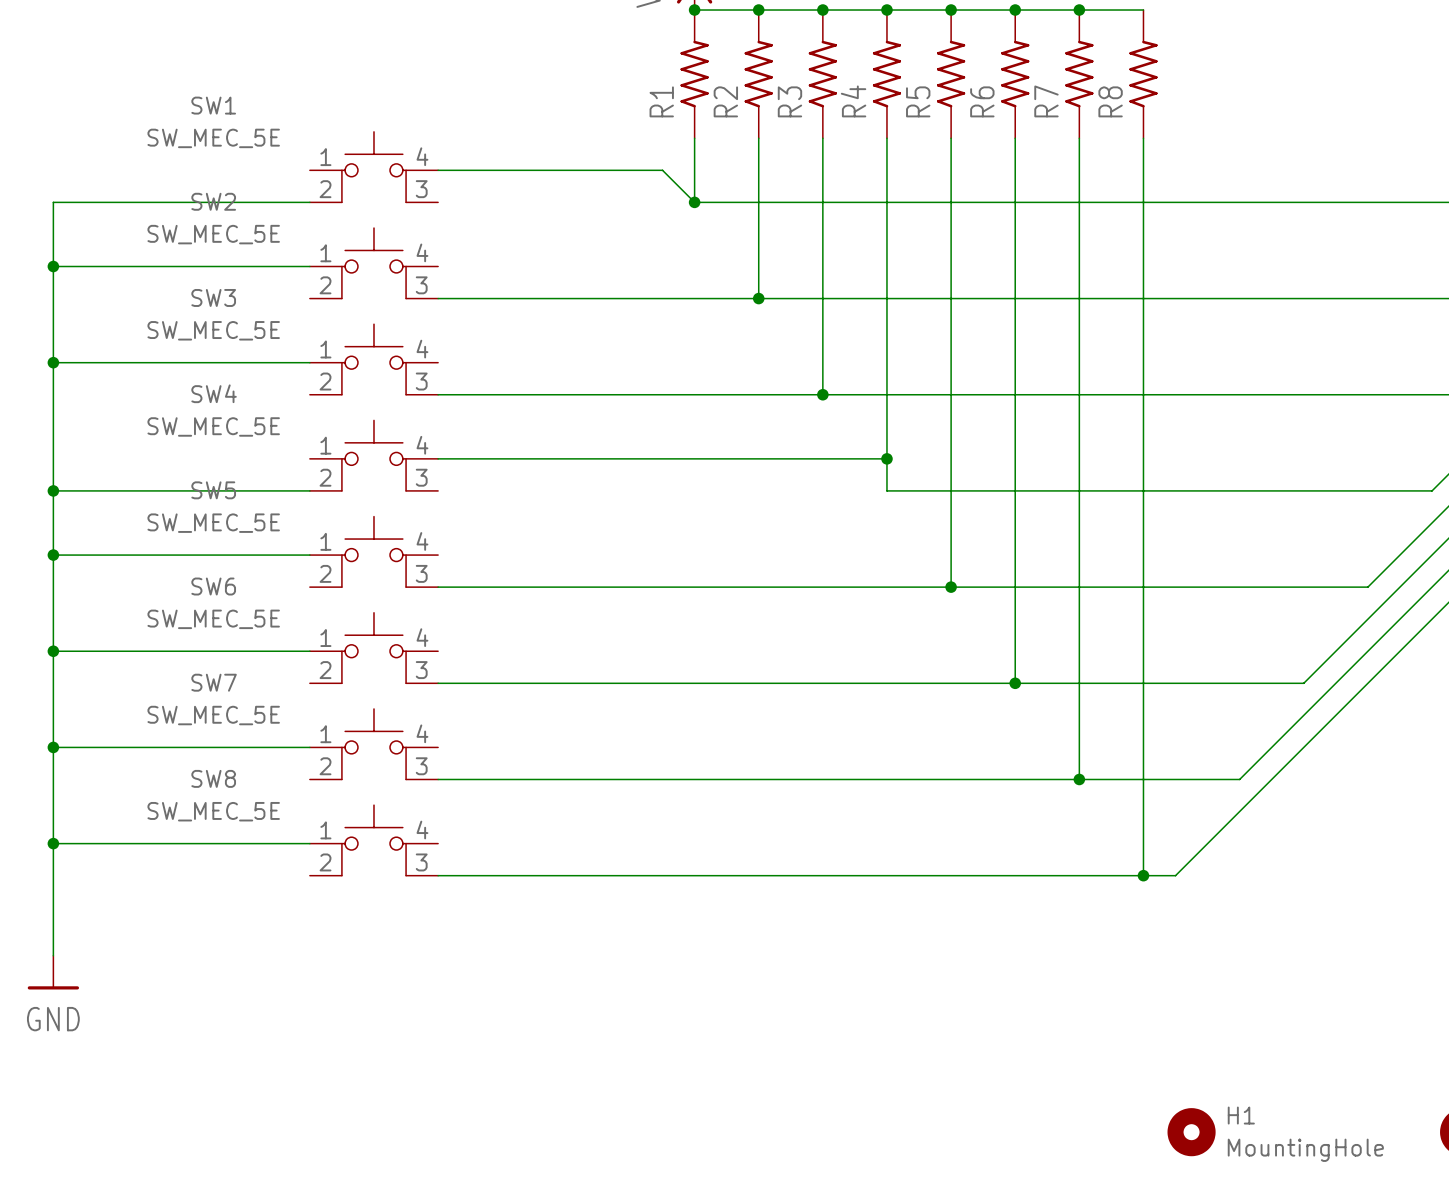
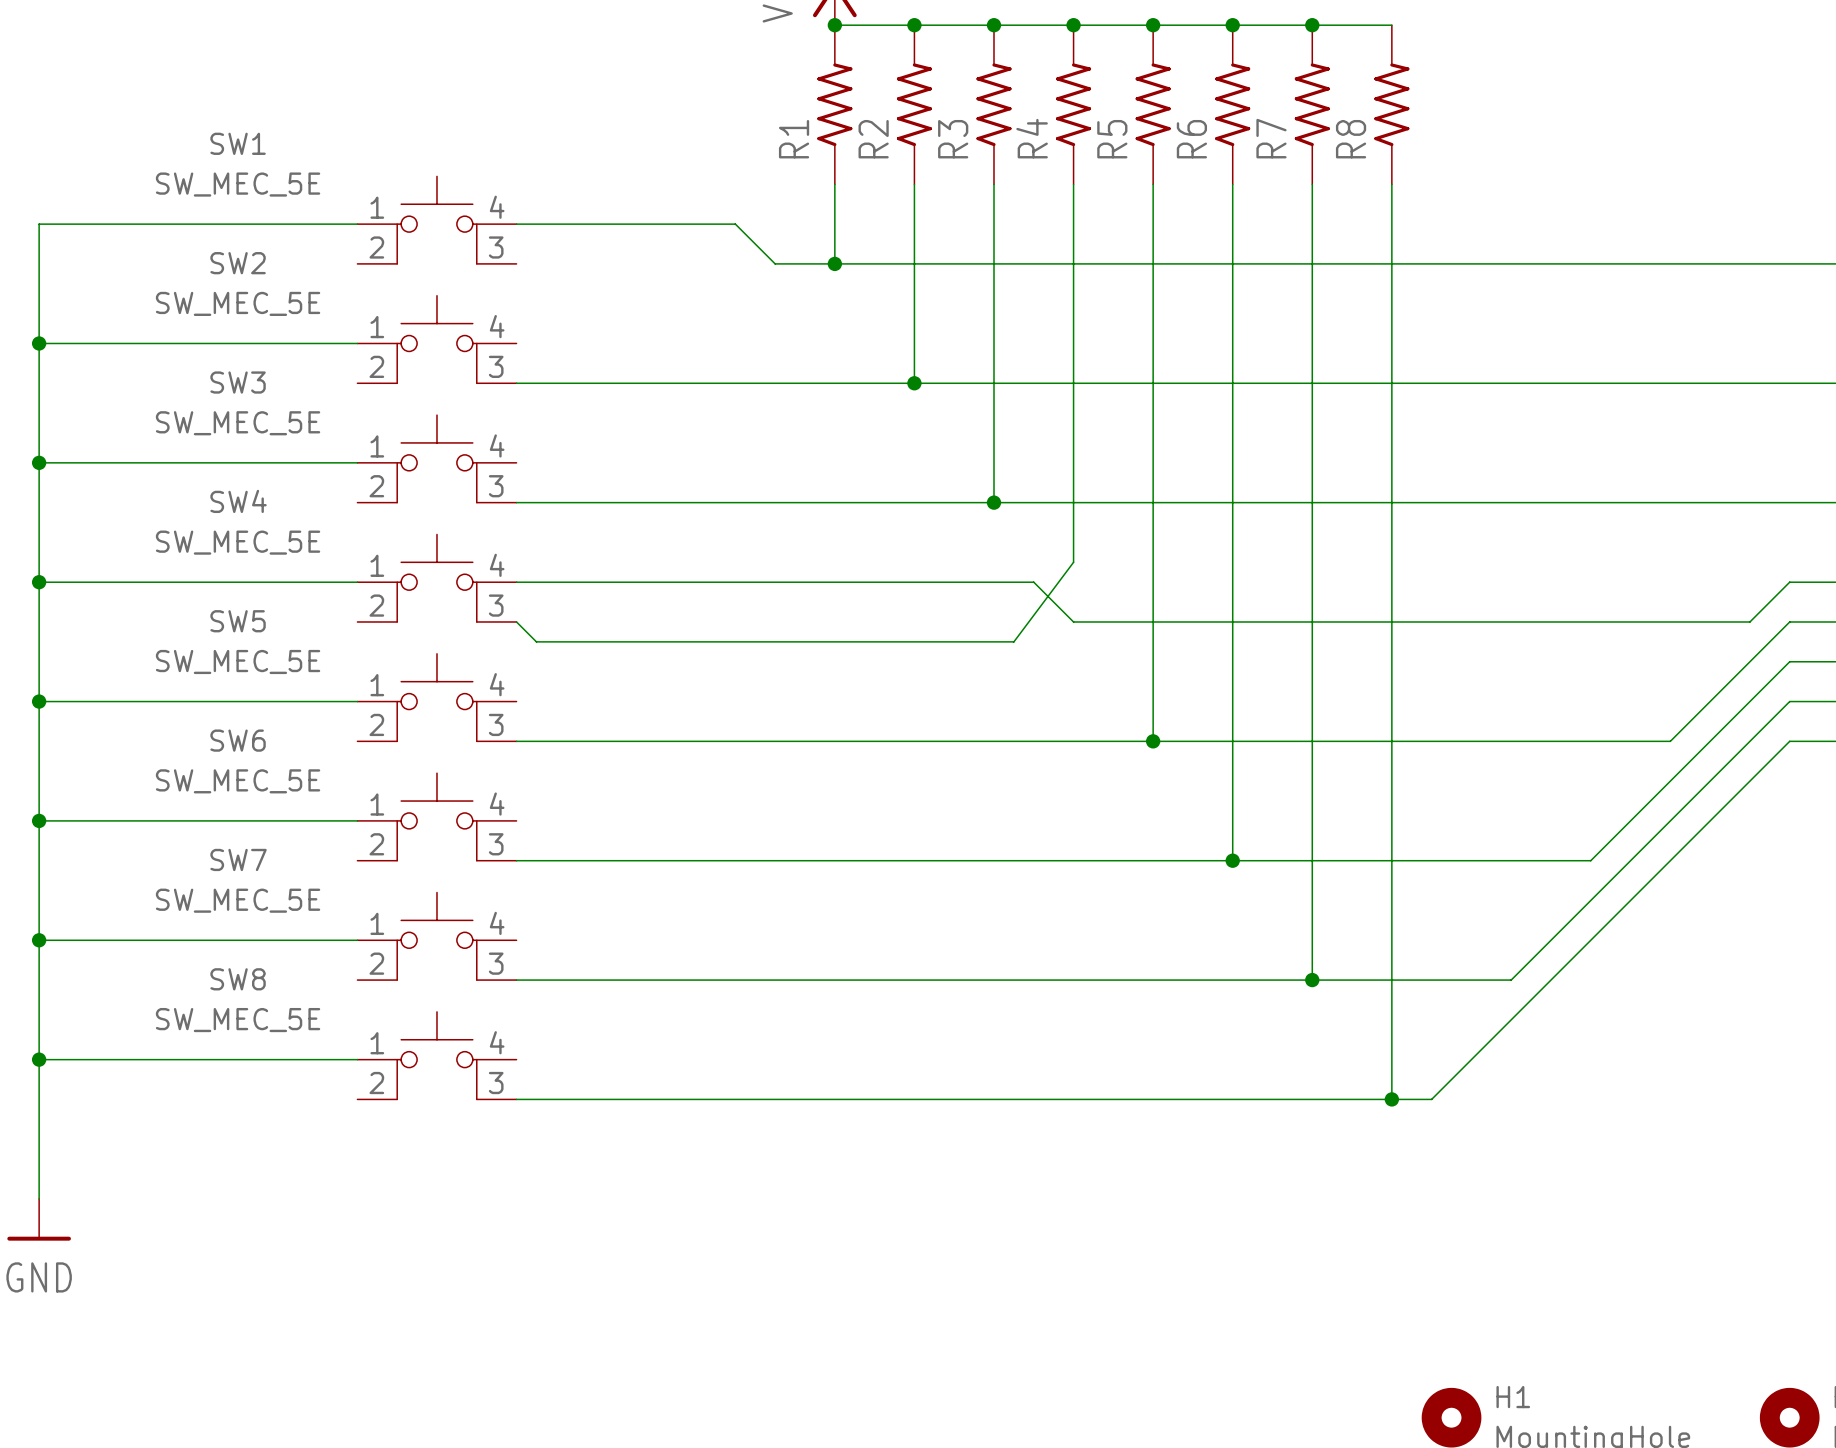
wire: (614, 170) (662, 170) (694, 202) -> (735, 224) (775, 263) (834, 263)
wire: (53, 202) (309, 202) -> (39, 263) (39, 224) (357, 224)
wire: (886, 442) (886, 490) -> (1073, 562) (1013, 641) (536, 641) (516, 621)
wire: (854, 458) (886, 458) -> (1033, 582) (1073, 621)
junction: (886, 458) -> none
wire: (53, 490) (309, 490) -> (39, 582) (357, 582)
junction position: (53, 490) -> (39, 582)

